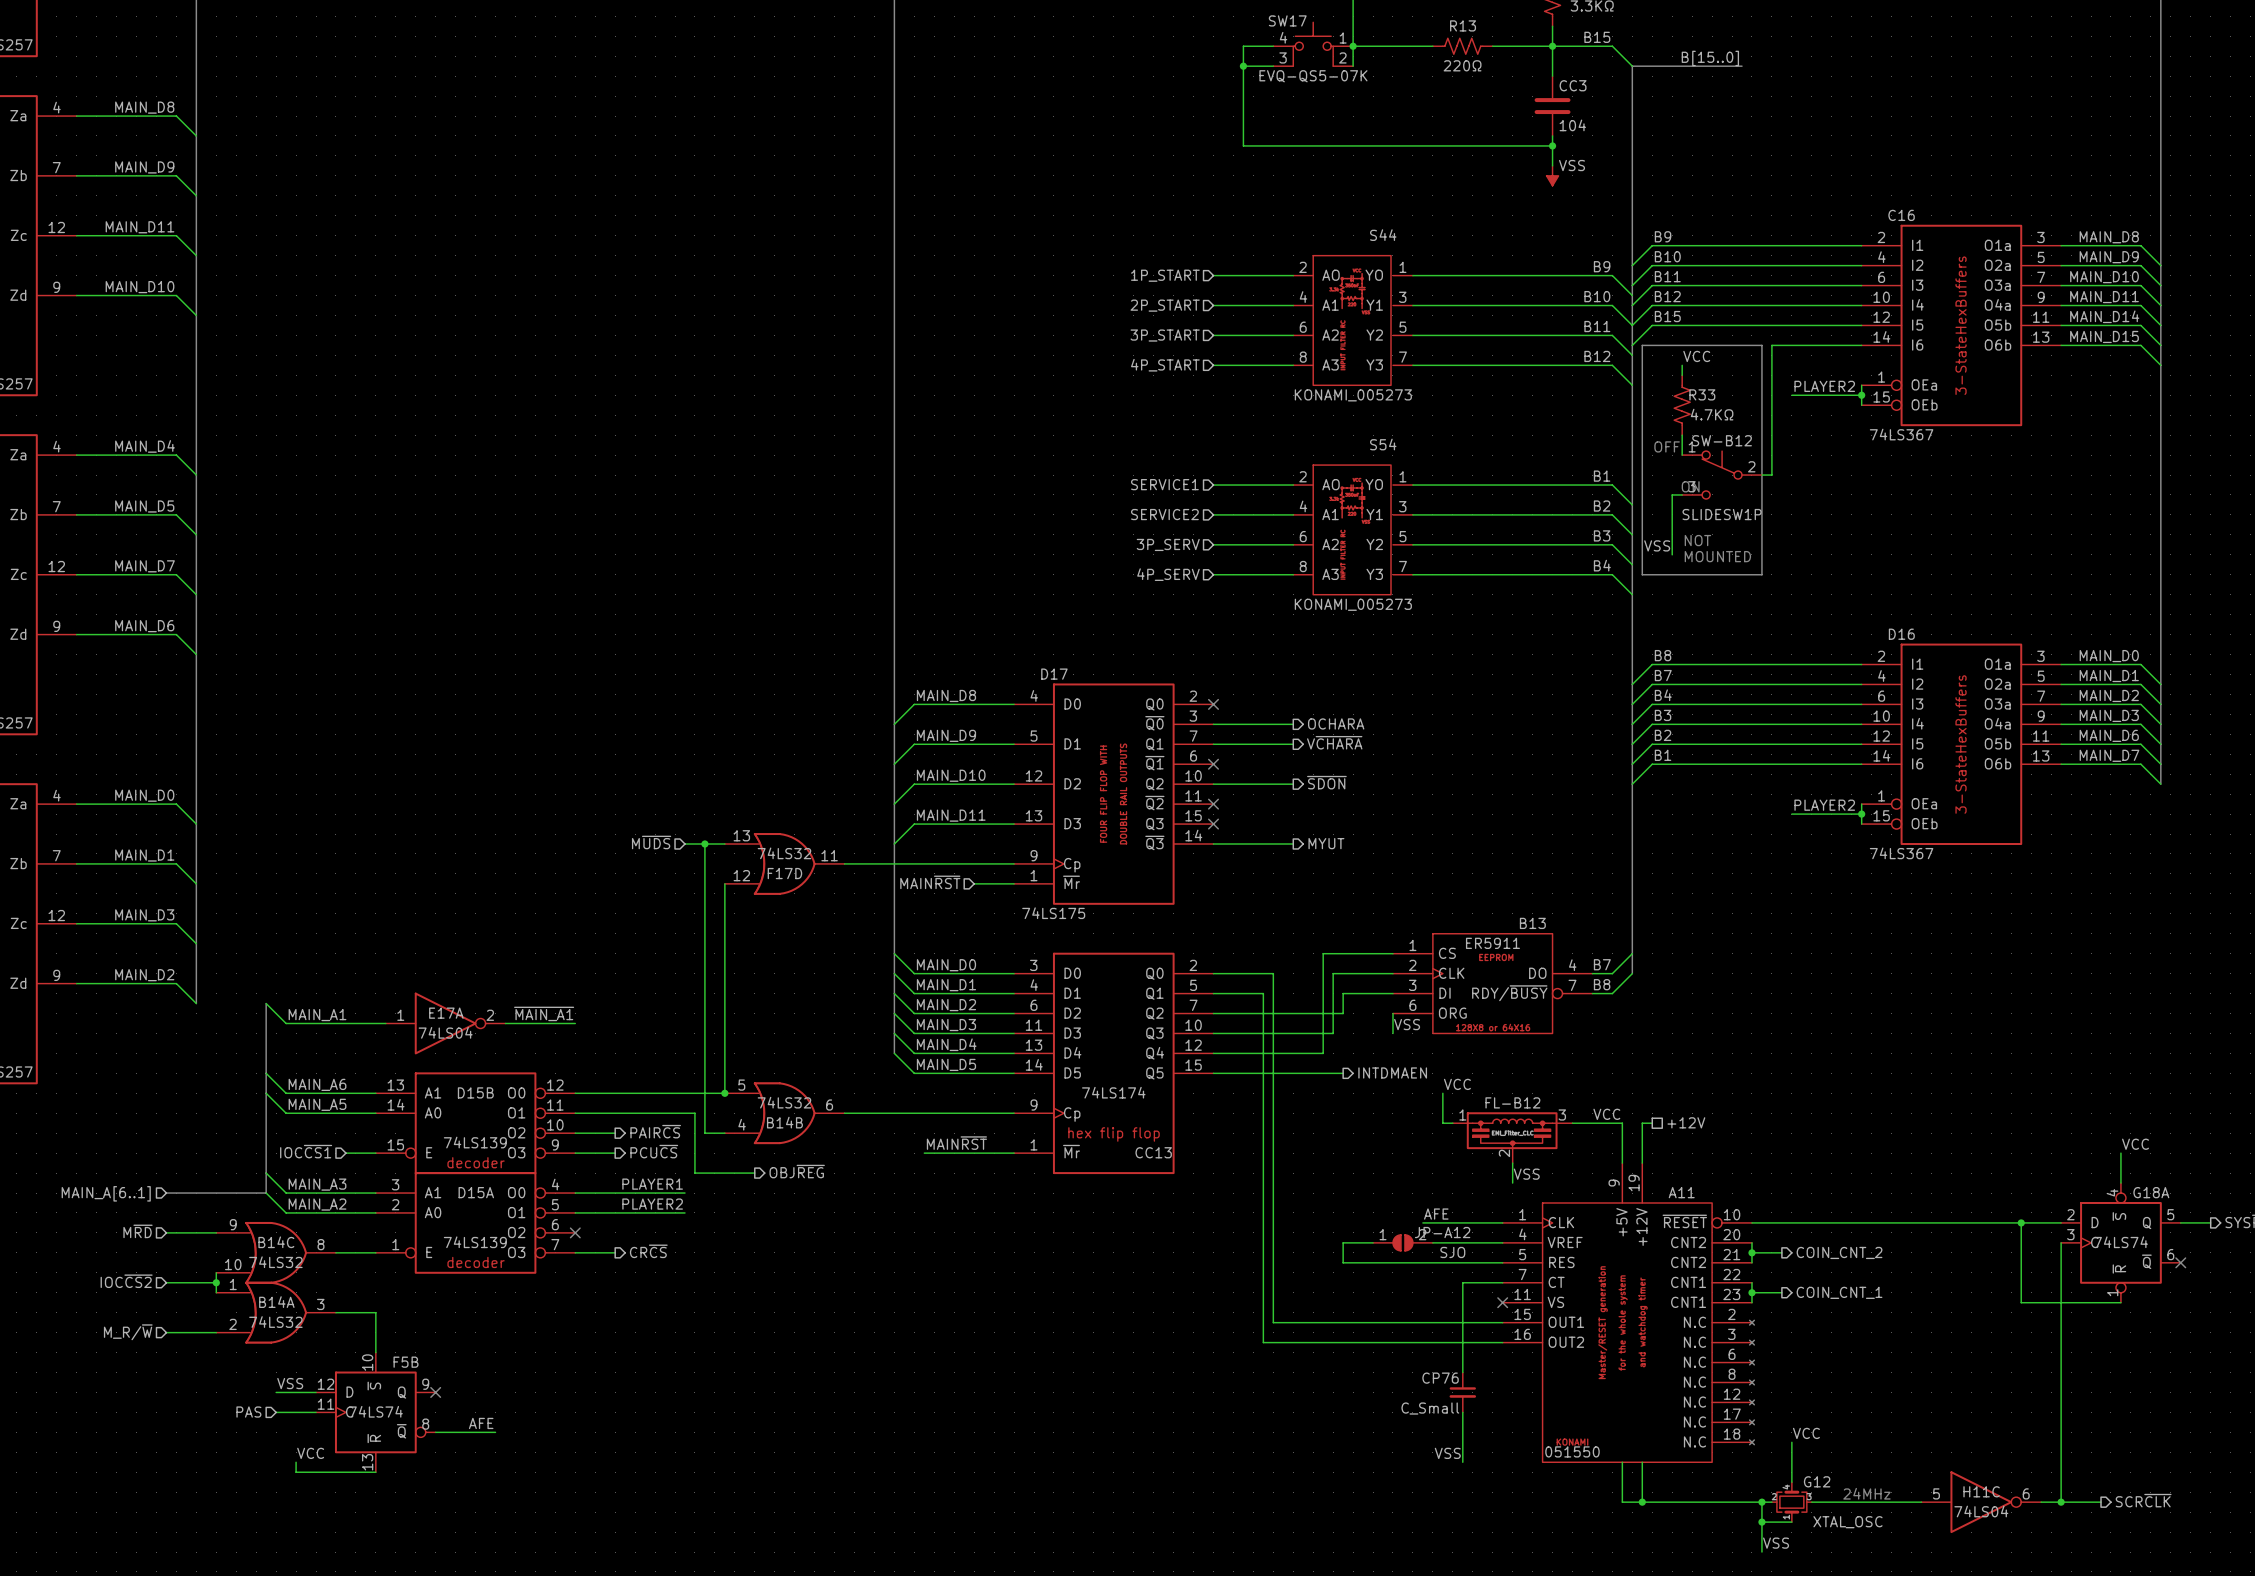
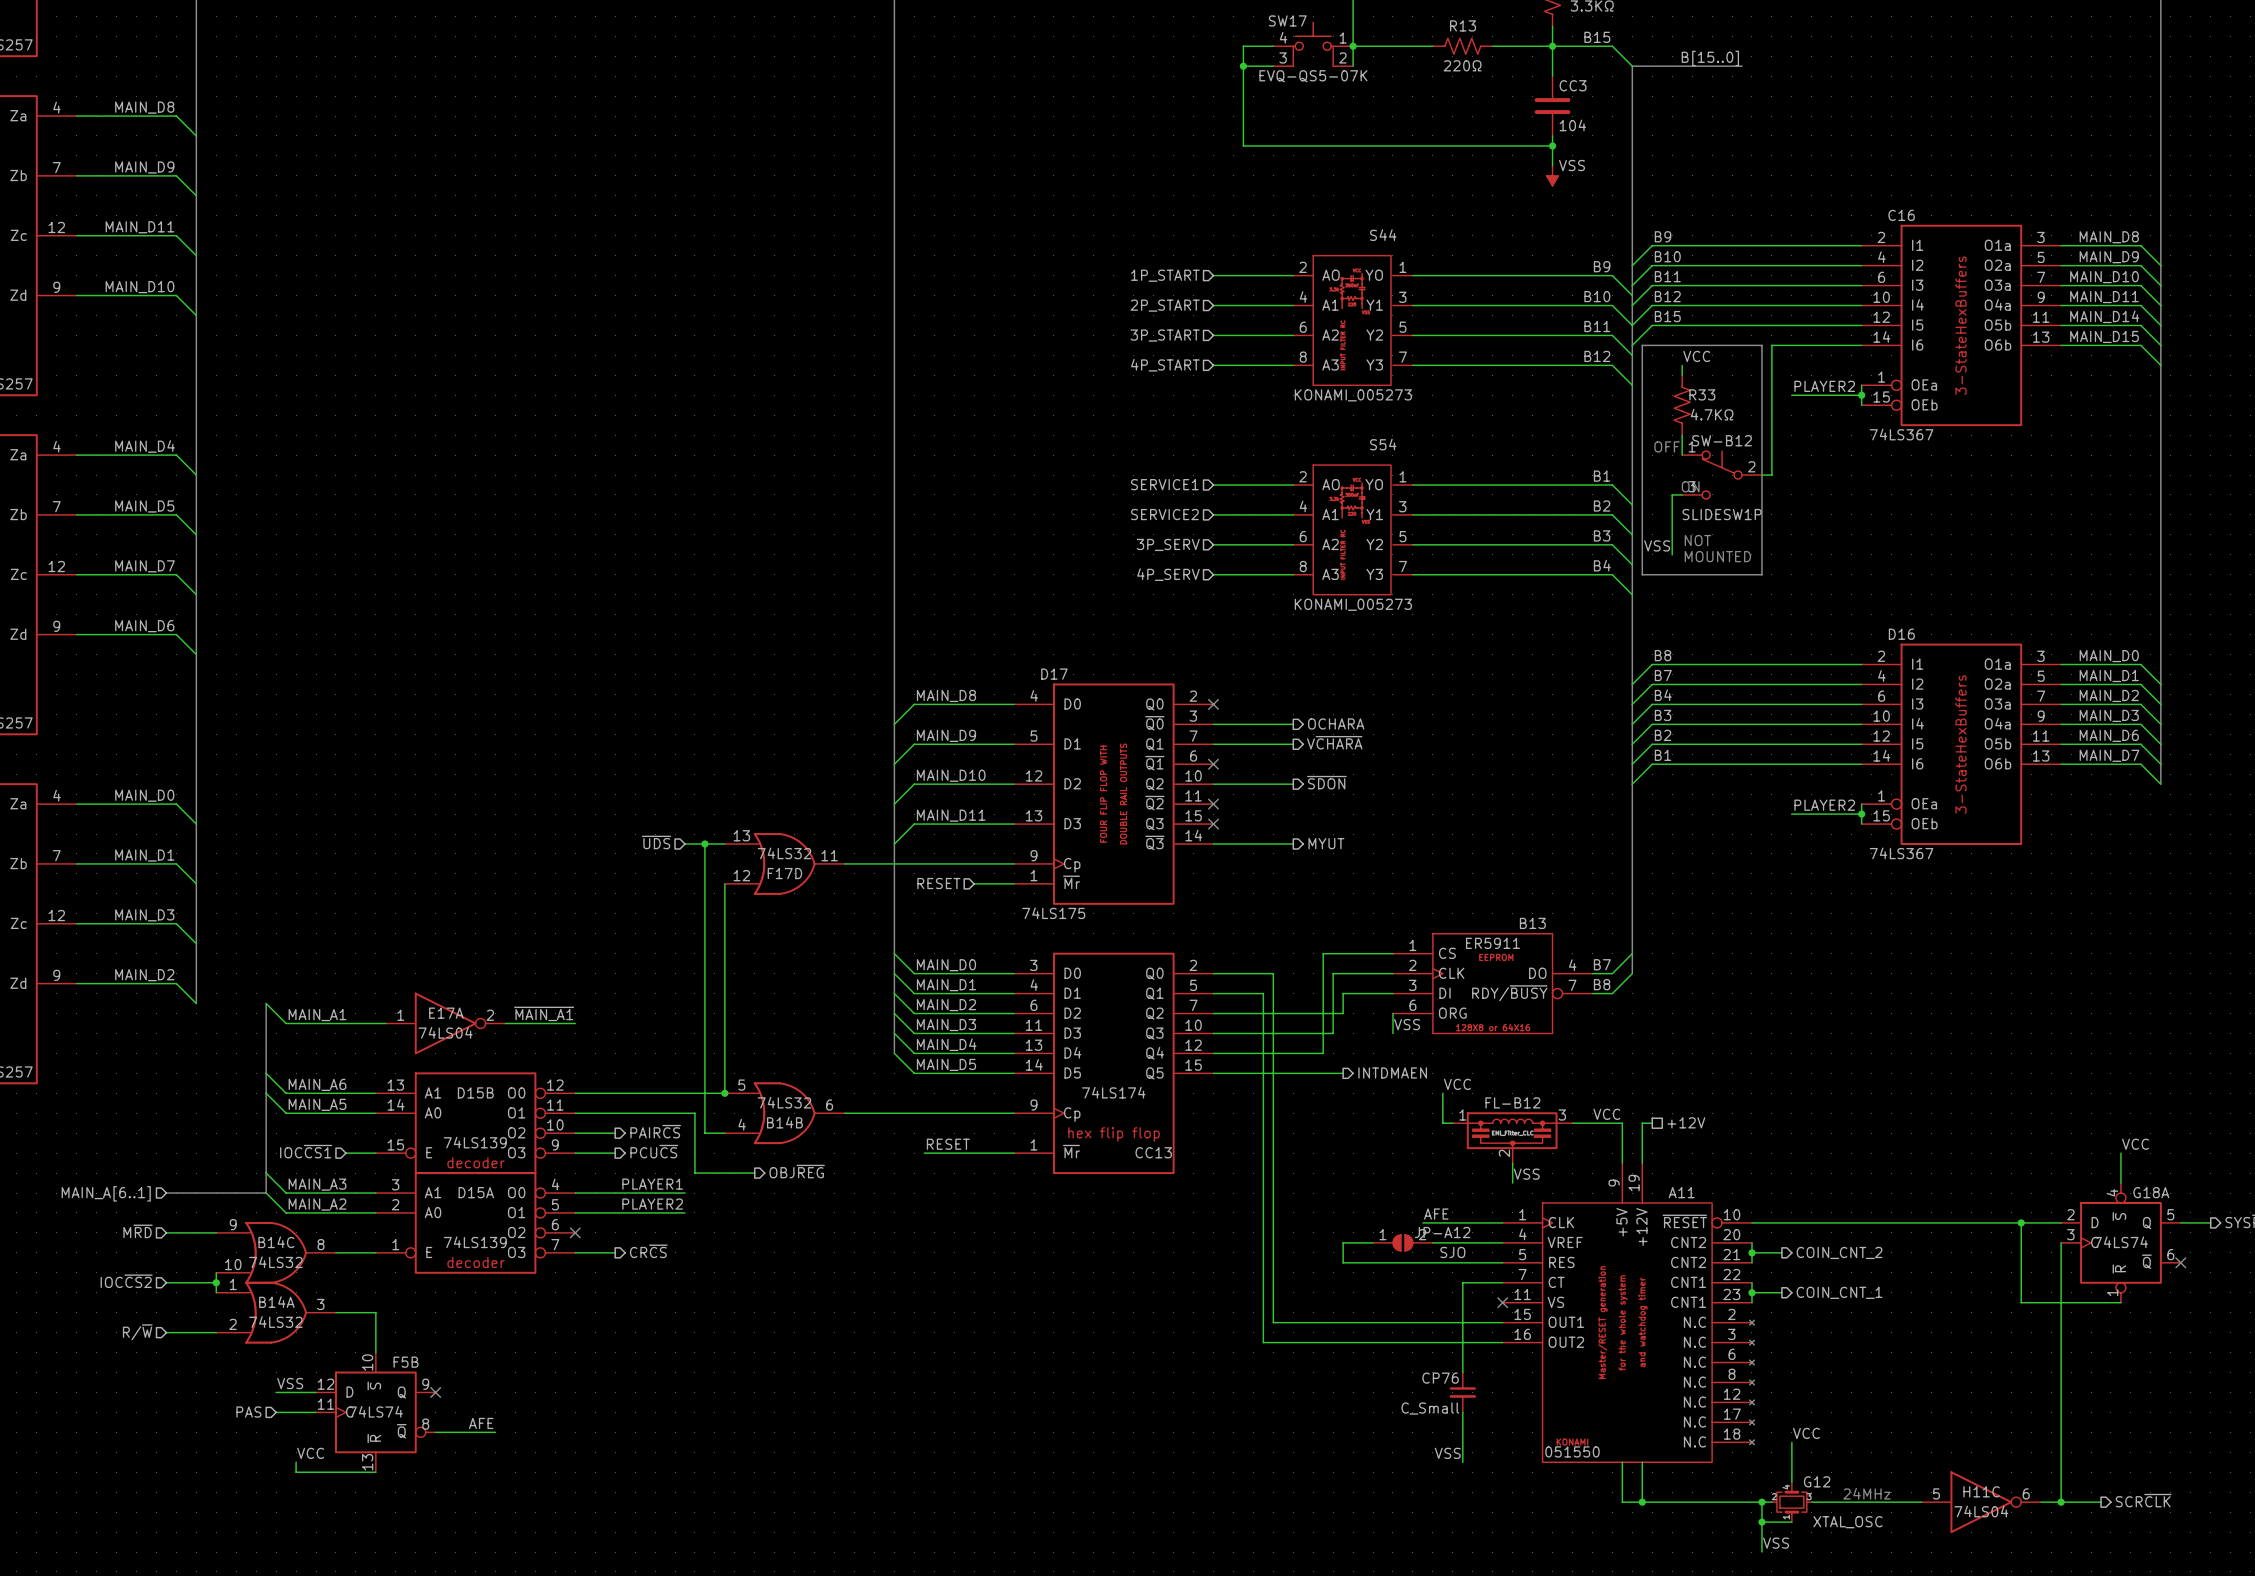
hierarchical label: M~{UDS} (651, 842) -> ~{UDS} (656, 842)
hierarchical label: MAIN~{RST} (930, 882) -> RESET (938, 883)
label: MAIN~{RST} (956, 1143) -> RESET (948, 1144)
hierarchical label: M_R/~{W} (128, 1332) -> R/~{W} (137, 1332)

